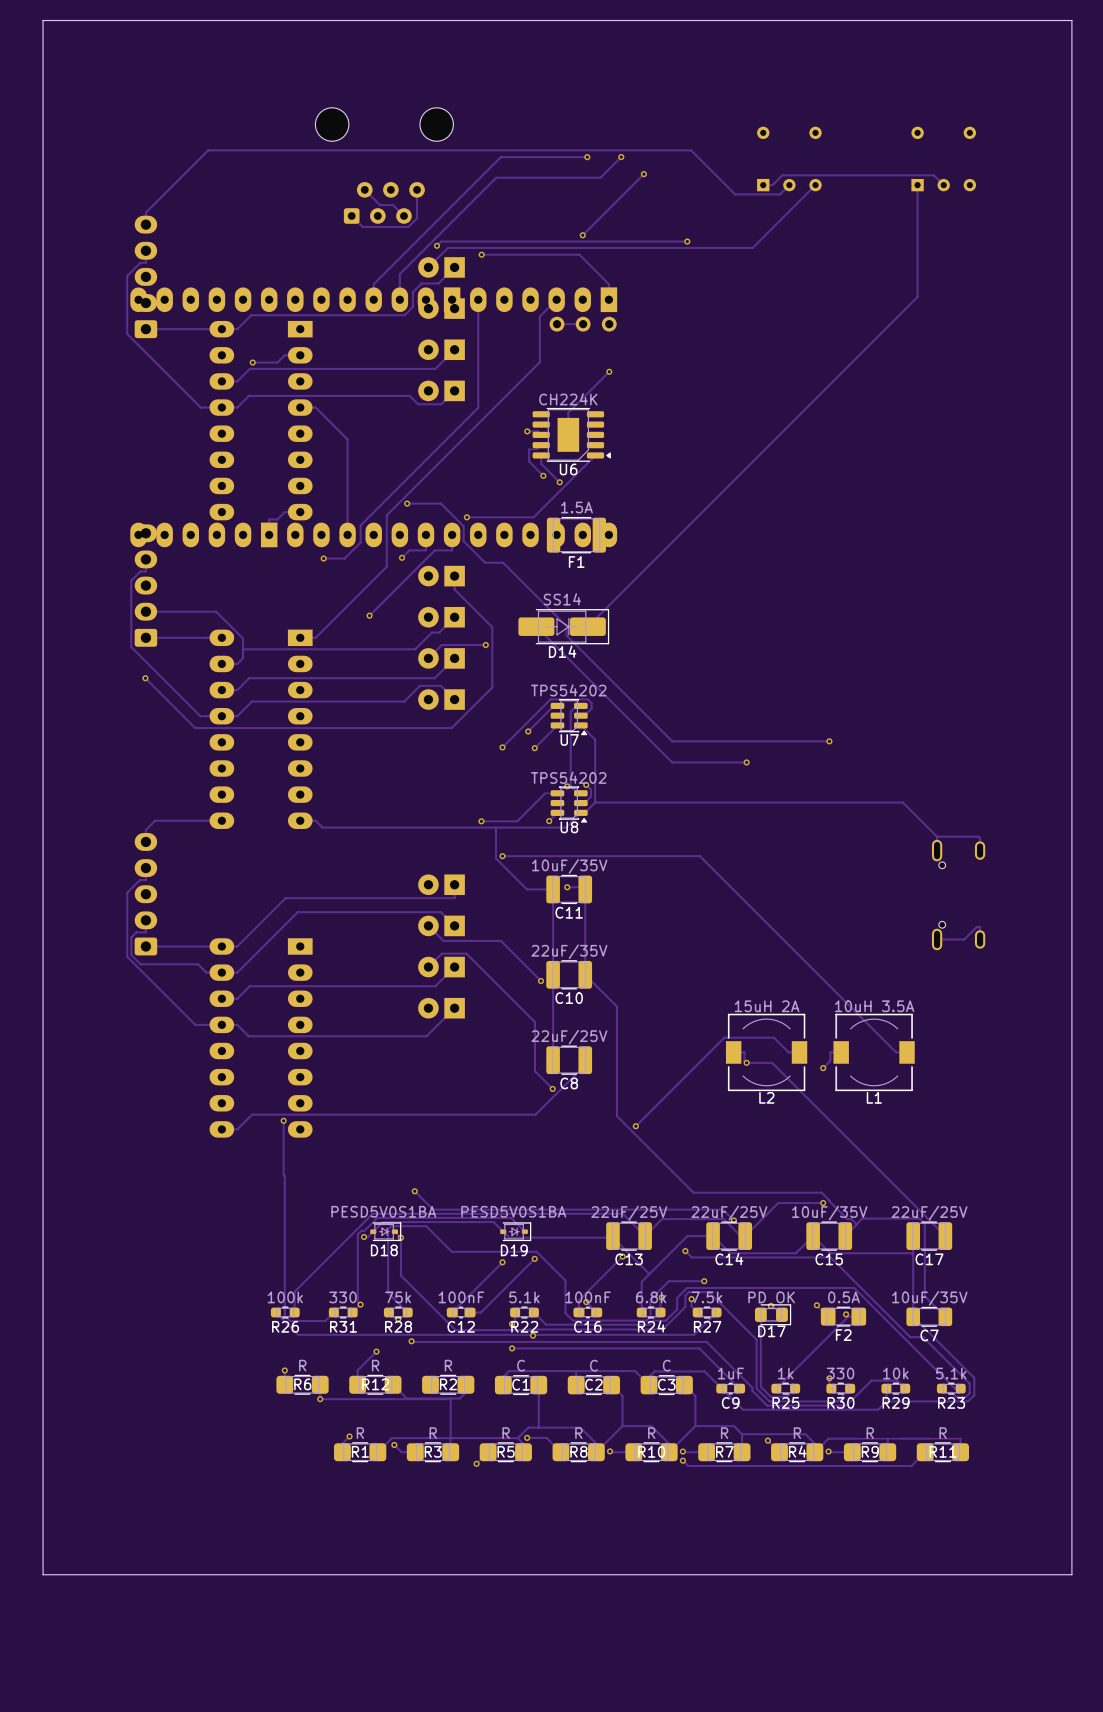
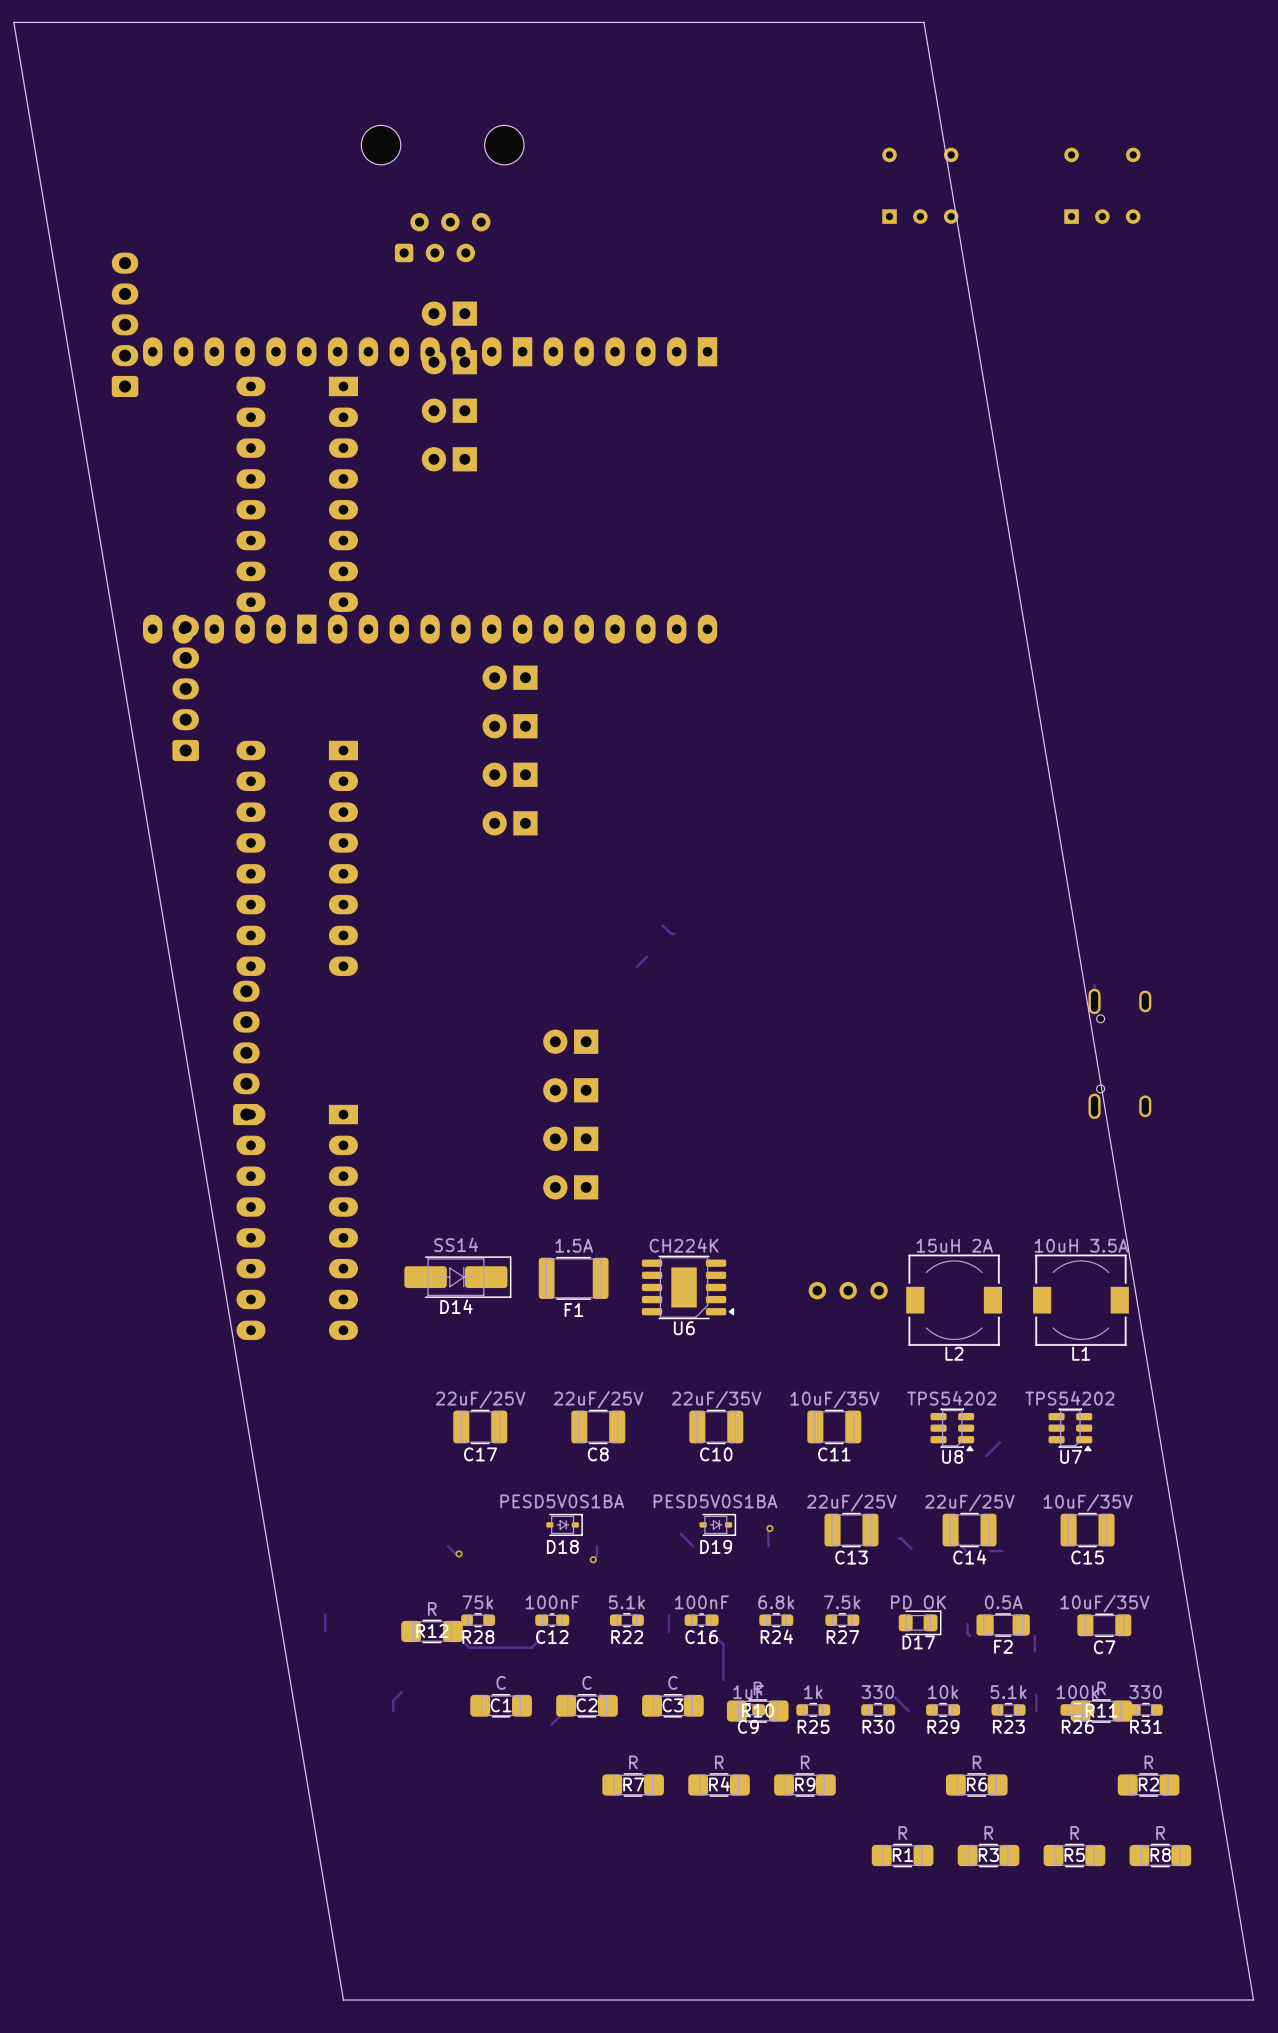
board edge: (792, 20) (1071, 20) (1071, 1574) (43, 1574) (43, 20) -> (923, 22) (1253, 2000) (343, 2000) (13, 22) (40, 22)
track: (587, 157) (500, 157) (373, 284) (373, 299) -> none
via: (587, 157) -> none
track: (621, 157) (600, 177) (496, 177) (399, 274) (399, 299) -> none
via: (621, 157) -> none
track: (643, 174) (582, 235) -> none
via: (643, 174) -> none
track: (789, 185) (780, 194) (735, 194) (691, 150) (208, 150) (145, 212) (145, 224) -> none
track: (815, 185) (752, 247) (447, 247) (428, 267) -> none
track: (917, 185) (917, 296) (587, 626) -> none
track: (943, 185) (933, 175) (782, 175) (772, 185) (763, 185) -> none
track: (364, 189) (379, 205) (393, 205) (403, 215) -> none
track: (417, 189) (417, 218) (408, 227) (362, 227) (351, 215) -> none
via: (582, 235) -> none
track: (687, 241) (441, 241) (436, 245) -> none
via: (687, 241) -> none
via: (436, 245) -> none
track: (145, 250) (145, 262) (140, 262) (127, 276) (127, 333) (200, 407) (237, 407) (248, 395) (409, 395) (418, 404) (441, 404) (454, 390) -> none
track: (481, 254) (579, 254) (608, 284) (608, 299) -> none
via: (481, 254) -> none
part: none -> (449, 313)
part: (441, 267) -> none
track: (454, 267) (438, 283) (421, 283) (412, 292) (412, 307) (404, 315) (251, 315) (237, 329) (145, 329) -> none
part position: (145, 276) -> (125, 324)
track: (478, 299) (478, 407) (360, 525) (360, 542) (344, 558) (323, 558) -> none
track: (556, 299) (539, 316) (539, 362) (386, 515) (386, 566) (315, 637) (300, 637) -> none
part: none -> (449, 362)
part: (441, 308) -> none
track: (583, 324) (557, 324) -> none
part: (583, 324) -> none
part: none -> (449, 410)
part: (441, 349) -> none
track: (454, 349) (435, 368) (249, 368) (237, 381) (221, 381) -> none
track: (300, 355) (284, 355) (277, 362) (252, 362) -> none
via: (252, 362) -> none
track: (609, 371) (568, 412) (568, 434) -> none
via: (609, 371) -> none
part: none -> (449, 459)
part: (441, 390) -> none
track: (300, 407) (315, 407) (347, 439) (347, 534) -> none
track: (527, 431) (537, 431) (541, 434) -> none
via: (527, 431) -> none
U6 position: (571, 434) -> (688, 1287)
track: (541, 445) (537, 449) (529, 449) (529, 461) (543, 475) -> none
track: (541, 455) (541, 463) (559, 482) -> none
track: (595, 455) (533, 517) (466, 517) -> none
via: (543, 475) -> none
via: (559, 482) -> none
track: (407, 503) (440, 503) (463, 526) (463, 541) (485, 562) (503, 562) (566, 626) (566, 635) (672, 741) (829, 741) -> none
via: (407, 503) -> none
track: (300, 512) (284, 512) (277, 519) (269, 519) (269, 534) -> none
via: (466, 517) -> none
track: (425, 534) (425, 550) (409, 550) (402, 557) -> none
track: (452, 534) (452, 550) (434, 550) (369, 615) -> none
F1 position: (576, 535) -> (573, 1278)
via: (402, 557) -> none
via: (323, 558) -> none
track: (145, 559) (145, 571) (140, 571) (131, 580) (131, 647) (200, 716) (237, 716) (251, 701) (404, 701) (419, 685) (440, 685) (454, 699) -> none
track: (454, 576) (454, 589) (492, 627) (492, 687) (451, 728) (195, 728) (145, 678) -> none
part position: (145, 585) -> (185, 688)
track: (145, 611) (216, 611) (242, 638) (242, 658) (237, 663) (221, 663) -> none
via: (369, 615) -> none
track: (454, 617) (439, 632) (432, 632) (415, 649) (242, 649) -> none
track: (536, 626) (672, 762) (746, 762) -> none
D14 position: (563, 626) -> (457, 1277)
track: (221, 637) (145, 637) -> none
track: (485, 645) (441, 645) (428, 658) -> none
via: (485, 645) -> none
track: (454, 658) (434, 678) (249, 678) (237, 690) (221, 690) -> none
via: (145, 678) -> none
track: (557, 705) (553, 705) (528, 731) -> none
track: (580, 705) (576, 705) (570, 711) (570, 786) (567, 786) -> none
track: (580, 715) (584, 715) (591, 708) (591, 703) (587, 699) (550, 699) (502, 747) -> none
U7 position: (569, 717) -> (1070, 1429)
track: (557, 725) (534, 748) -> none
track: (580, 725) (595, 739) (595, 802) -> none
via: (528, 731) -> none
via: (829, 741) -> none
via: (502, 747) -> none
via: (534, 748) -> none
via: (746, 762) -> none
track: (586, 784) (591, 789) (591, 796) (584, 803) (580, 803) -> none
via: (586, 784) -> none
via: (567, 786) -> none
track: (557, 793) (545, 793) (517, 821) (481, 821) -> none
track: (595, 802) (584, 812) (580, 812) (566, 827) (322, 827) (315, 820) (300, 820) -> none
track: (595, 802) (902, 802) (937, 836) (978, 836) (980, 850) -> none
U8 position: (569, 804) -> (952, 1429)
track: (221, 820) (155, 820) (145, 829) (145, 841) -> none
via: (481, 821) -> none
via: (549, 821) -> none
track: (495, 827) (495, 858) (526, 889) (553, 889) (553, 1060) -> none
track: (502, 856) (699, 856) (896, 1052) (907, 1052) -> none
via: (502, 856) -> none
track: (145, 868) (145, 880) (139, 880) (127, 892) (127, 956) (195, 1024) (237, 1024) (248, 1036) (426, 1036) (454, 1008) -> none
part: (441, 884) -> none
track: (454, 884) (454, 898) (285, 898) (237, 946) (145, 946) -> none
part: none -> (570, 1041)
track: (567, 887) (583, 887) (585, 889) (585, 974) (616, 1006) (616, 1116) (693, 1192) (821, 1192) (847, 1219) (851, 1219) (856, 1224) (862, 1218) (919, 1218) (924, 1223) (924, 1296) (945, 1316) -> none
via: (567, 887) -> none
C11 position: (569, 889) -> (834, 1426)
part position: (145, 894) -> (246, 1052)
track: (145, 920) (145, 932) (136, 932) (131, 937) (131, 955) (140, 964) (198, 964) (206, 972) (237, 972) (297, 912) (440, 912) (454, 925) -> none
track: (428, 925) (443, 940) (500, 940) (541, 981) -> none
part: (441, 925) -> none
part: none -> (570, 1090)
track: (980, 939) (980, 927) (976, 927) (964, 939) (937, 939) -> none
track: (428, 967) (441, 953) (466, 953) (534, 1022) (534, 1071) (552, 1088) -> none
part: (441, 967) -> none
track: (454, 967) (435, 986) (249, 986) (237, 998) (221, 998) -> none
part: none -> (570, 1138)
C10 position: (569, 974) -> (716, 1426)
via: (541, 981) -> none
part: (441, 1008) -> none
part: none -> (570, 1187)
track: (733, 1052) (744, 1052) (744, 1060) (746, 1062) (772, 1062) (945, 1236) -> none
L2 position: (766, 1052) -> (954, 1300)
track: (799, 1052) (788, 1052) (773, 1037) (724, 1037) (635, 1126) -> none
track: (841, 1052) (830, 1052) (830, 1060) (823, 1068) -> none
L1 position: (874, 1052) -> (1080, 1300)
C8 position: (569, 1060) -> (598, 1426)
track: (585, 1060) (585, 1065) (535, 1114) (252, 1114) (237, 1129) (221, 1129) -> none
via: (746, 1062) -> none
via: (823, 1068) -> none
via: (552, 1088) -> none
part: none -> (848, 1290)
track: (283, 1120) (284, 1315) (290, 1321) (325, 1321) (333, 1312) -> none
via: (283, 1120) -> none
via: (635, 1126) -> none
track: (414, 1191) (433, 1209) (723, 1209) (733, 1220) -> none
via: (414, 1191) -> none
track: (823, 1203) (778, 1203) (745, 1236) (740, 1236) (723, 1219) (662, 1219) (645, 1236) (622, 1213) (372, 1213) (294, 1291) (294, 1312) -> none
via: (823, 1203) -> none
via: (733, 1220) -> none
D18 position: (385, 1231) -> (564, 1524)
track: (394, 1231) (400, 1237) (400, 1275) (455, 1330) (662, 1329) (685, 1306) (685, 1295) (689, 1292) (709, 1292) (756, 1339) (756, 1388) (769, 1401) (837, 1401) (850, 1388) -> none
D19 position: (515, 1231) -> (717, 1524)
track: (524, 1231) (511, 1217) (377, 1217) (364, 1230) (357, 1234) (357, 1301) (360, 1304) (352, 1312) -> none
C13 position: (629, 1236) -> (851, 1530)
C14 position: (729, 1236) -> (969, 1530)
C15 position: (829, 1236) -> (1087, 1530)
track: (913, 1236) (913, 1316) (974, 1377) (974, 1395) (968, 1401) (886, 1401) (878, 1409) (742, 1409) (704, 1371) (654, 1371) (645, 1381) -> none
C17 position: (929, 1236) -> (480, 1426)
track: (364, 1237) (368, 1237) (382, 1222) (493, 1222) (509, 1237) (612, 1237) -> none
via: (364, 1237) -> none
via: (400, 1237) -> none
track: (612, 1237) (649, 1274) -> none
track: (685, 1251) (691, 1257) (830, 1257) (910, 1337) (923, 1337) (969, 1383) (969, 1393) (966, 1396) (956, 1396) (941, 1388) -> none
via: (685, 1251) -> none
track: (913, 1253) (830, 1253) (813, 1236) (795, 1253) (730, 1253) (713, 1236) (687, 1236) (641, 1281) (641, 1312) -> none
track: (622, 1256) (578, 1300) (578, 1312) -> none
via: (622, 1256) -> none
track: (534, 1258) (481, 1312) (470, 1312) -> none
via: (534, 1258) -> none
track: (502, 1262) (452, 1312) -> none
via: (502, 1262) -> none
track: (704, 1281) (668, 1281) (650, 1299) (650, 1316) (646, 1320) (572, 1320) (565, 1313) (565, 1280) (536, 1251) (451, 1251) (426, 1226) (391, 1226) (388, 1229) (388, 1292) (407, 1312) -> none
via: (704, 1281) -> none
track: (691, 1299) (691, 1306) (697, 1312) -> none
via: (691, 1299) -> none
via: (586, 1302) -> none
via: (360, 1304) -> none
via: (770, 1305) -> none
via: (816, 1305) -> none
R26 position: (285, 1312) -> (1077, 1709)
R31 position: (343, 1312) -> (1145, 1709)
R28 position: (398, 1312) -> (478, 1620)
C12 position: (461, 1312) -> (552, 1620)
R22 position: (524, 1312) -> (626, 1620)
track: (533, 1312) (546, 1324) (649, 1324) (653, 1320) (665, 1320) (677, 1309) (677, 1297) (687, 1287) (854, 1287) (954, 1388) (960, 1388) -> none
C16 position: (587, 1312) -> (701, 1620)
R24 position: (651, 1312) -> (776, 1620)
R27 position: (707, 1312) -> (842, 1620)
track: (716, 1312) (694, 1334) (298, 1334) (275, 1312) -> none
track: (760, 1314) (760, 1386) (770, 1396) (786, 1396) (795, 1388) -> none
D17 position: (773, 1314) -> (920, 1622)
track: (846, 1314) (848, 1316) (776, 1388) -> none
via: (846, 1314) -> none
F2 position: (843, 1316) -> (1003, 1625)
C7 position: (929, 1316) -> (1104, 1625)
via: (533, 1335) -> none
track: (411, 1341) (706, 1341) (752, 1387) (752, 1390) (767, 1405) (846, 1405) (871, 1380) (897, 1380) (905, 1388) -> none
via: (411, 1341) -> none
track: (512, 1348) (699, 1348) (739, 1388) -> none
via: (512, 1348) -> none
track: (376, 1351) (357, 1370) (357, 1384) -> none
via: (376, 1351) -> none
via: (284, 1370) -> none
via: (829, 1378) -> none
R6 position: (302, 1384) -> (976, 1784)
track: (320, 1384) (320, 1399) (450, 1399) -> none
R2 position: (448, 1384) -> (1148, 1784)
C1 position: (521, 1385) -> (501, 1705)
track: (538, 1385) (538, 1427) -> none
C2 position: (593, 1385) -> (587, 1705)
track: (649, 1385) (635, 1371) (509, 1371) (503, 1376) (503, 1385) -> none
C3 position: (666, 1385) -> (672, 1705)
track: (684, 1385) (695, 1396) (695, 1426) -> none
C9 position: (730, 1388) -> (748, 1709)
R25 position: (785, 1388) -> (813, 1709)
R30 position: (840, 1388) -> (878, 1709)
R29 position: (895, 1388) -> (943, 1709)
R23 position: (951, 1388) -> (1008, 1709)
track: (450, 1398) (450, 1452) -> none
via: (320, 1399) -> none
track: (695, 1426) (733, 1426) (742, 1434) -> none
track: (695, 1426) (673, 1448) -> none
track: (742, 1434) (805, 1434) (819, 1447) -> none
track: (742, 1434) (742, 1452) -> none
via: (349, 1436) -> none
track: (527, 1437) (546, 1437) (560, 1452) -> none
via: (527, 1437) -> none
via: (767, 1440) -> none
track: (394, 1444) (401, 1452) (415, 1452) -> none
via: (394, 1444) -> none
track: (600, 1447) (580, 1427) (528, 1427) (517, 1438) (391, 1438) (377, 1452) -> none
track: (673, 1448) (651, 1426) (622, 1426) (596, 1452) -> none
track: (610, 1451) (633, 1452) -> none
via: (610, 1451) -> none
track: (682, 1451) (706, 1452) -> none
via: (682, 1451) -> none
track: (828, 1451) (852, 1452) -> none
via: (828, 1451) -> none
R1 position: (360, 1452) -> (902, 1855)
R3 position: (432, 1452) -> (988, 1855)
R5 position: (505, 1452) -> (1074, 1855)
R8 position: (578, 1452) -> (1160, 1855)
R7 position: (724, 1452) -> (633, 1784)
R4 position: (797, 1452) -> (719, 1784)
R9 position: (870, 1452) -> (804, 1784)
track: (925, 1452) (911, 1465) (688, 1465) (682, 1460) -> none
track: (960, 1452) (960, 1438) (929, 1438) (828, 1438) (814, 1452) -> none
via: (682, 1460) -> none
via: (476, 1463) -> none

